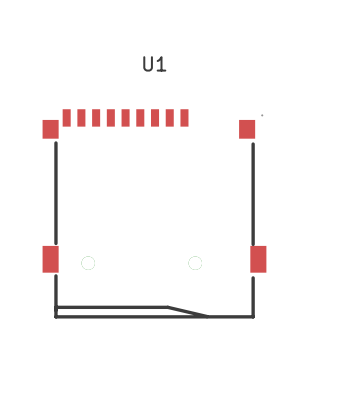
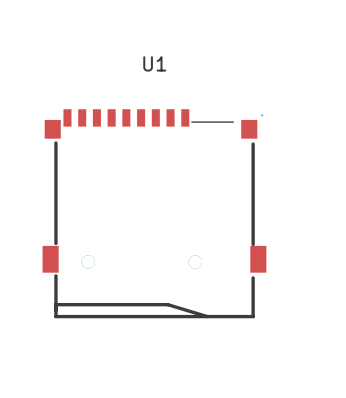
U1 footprint: [42, 109, 267, 319] -> [42, 109, 267, 319]

